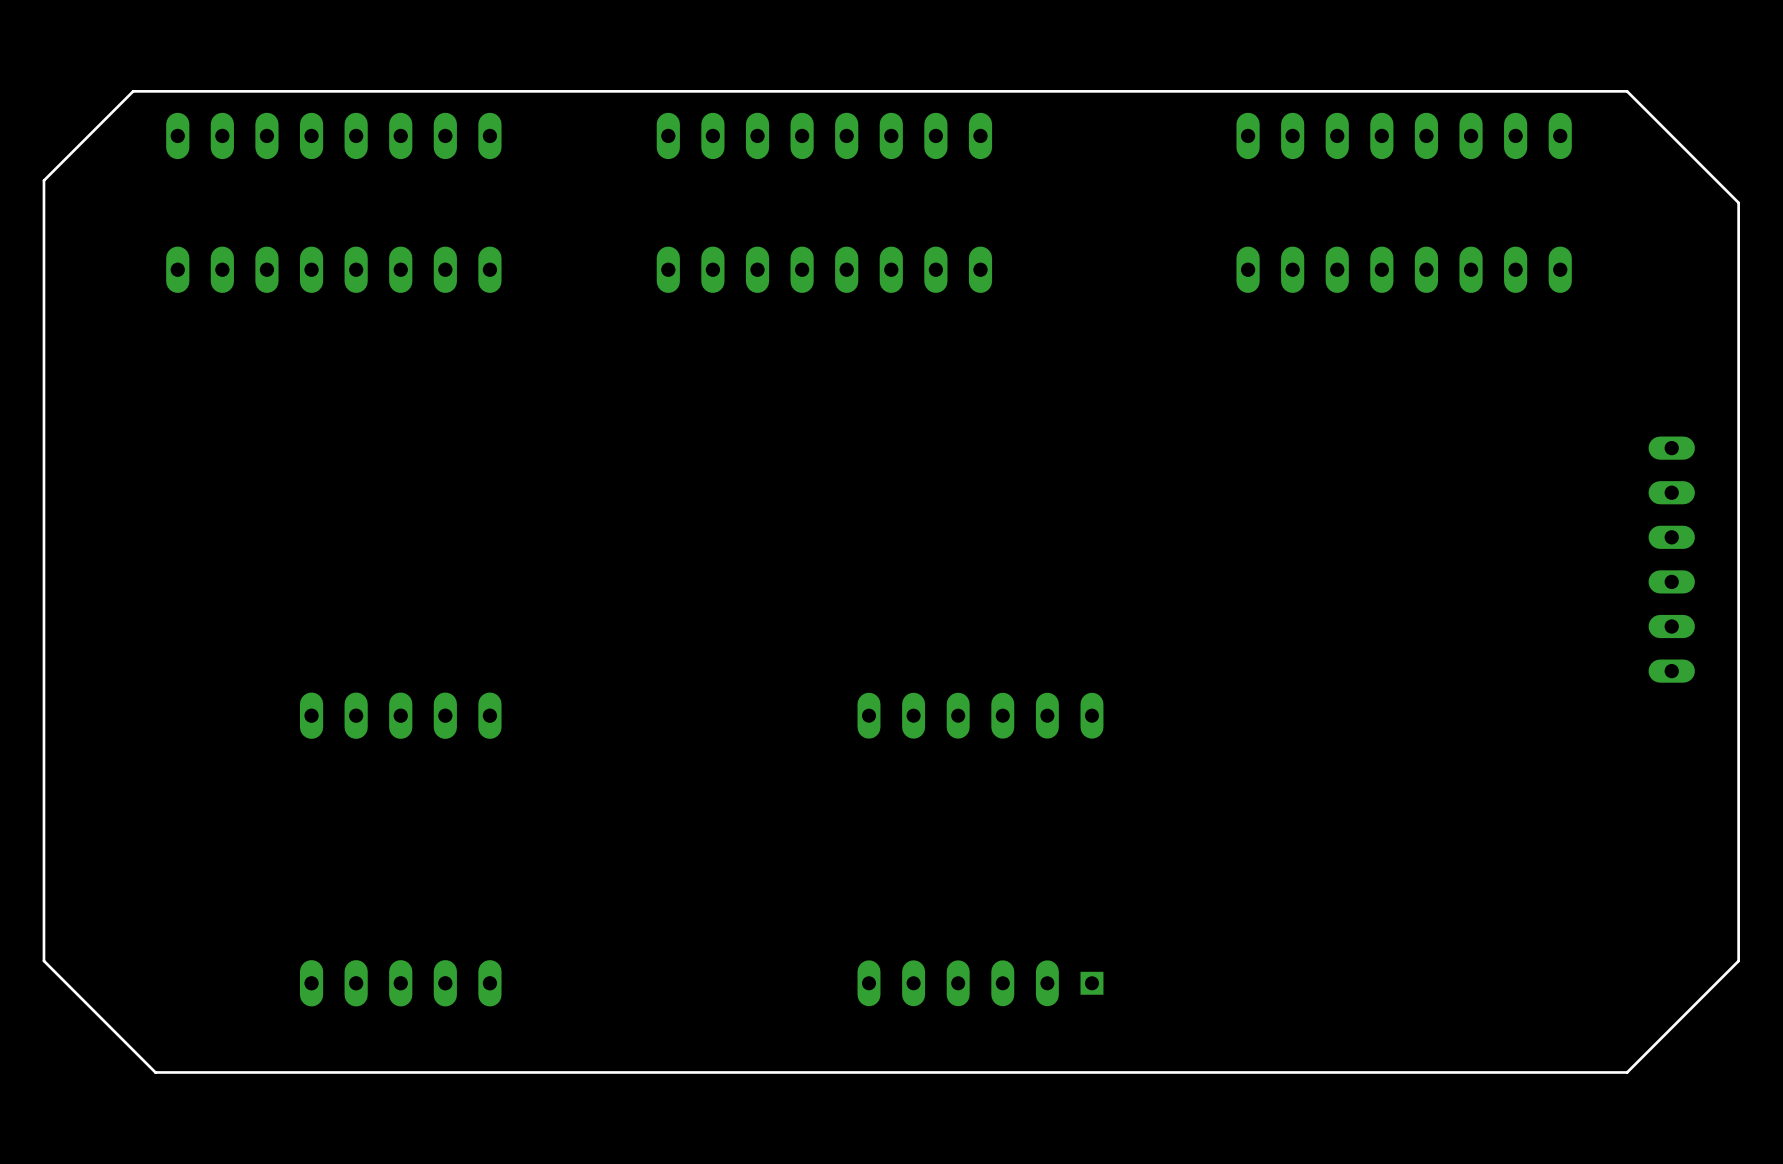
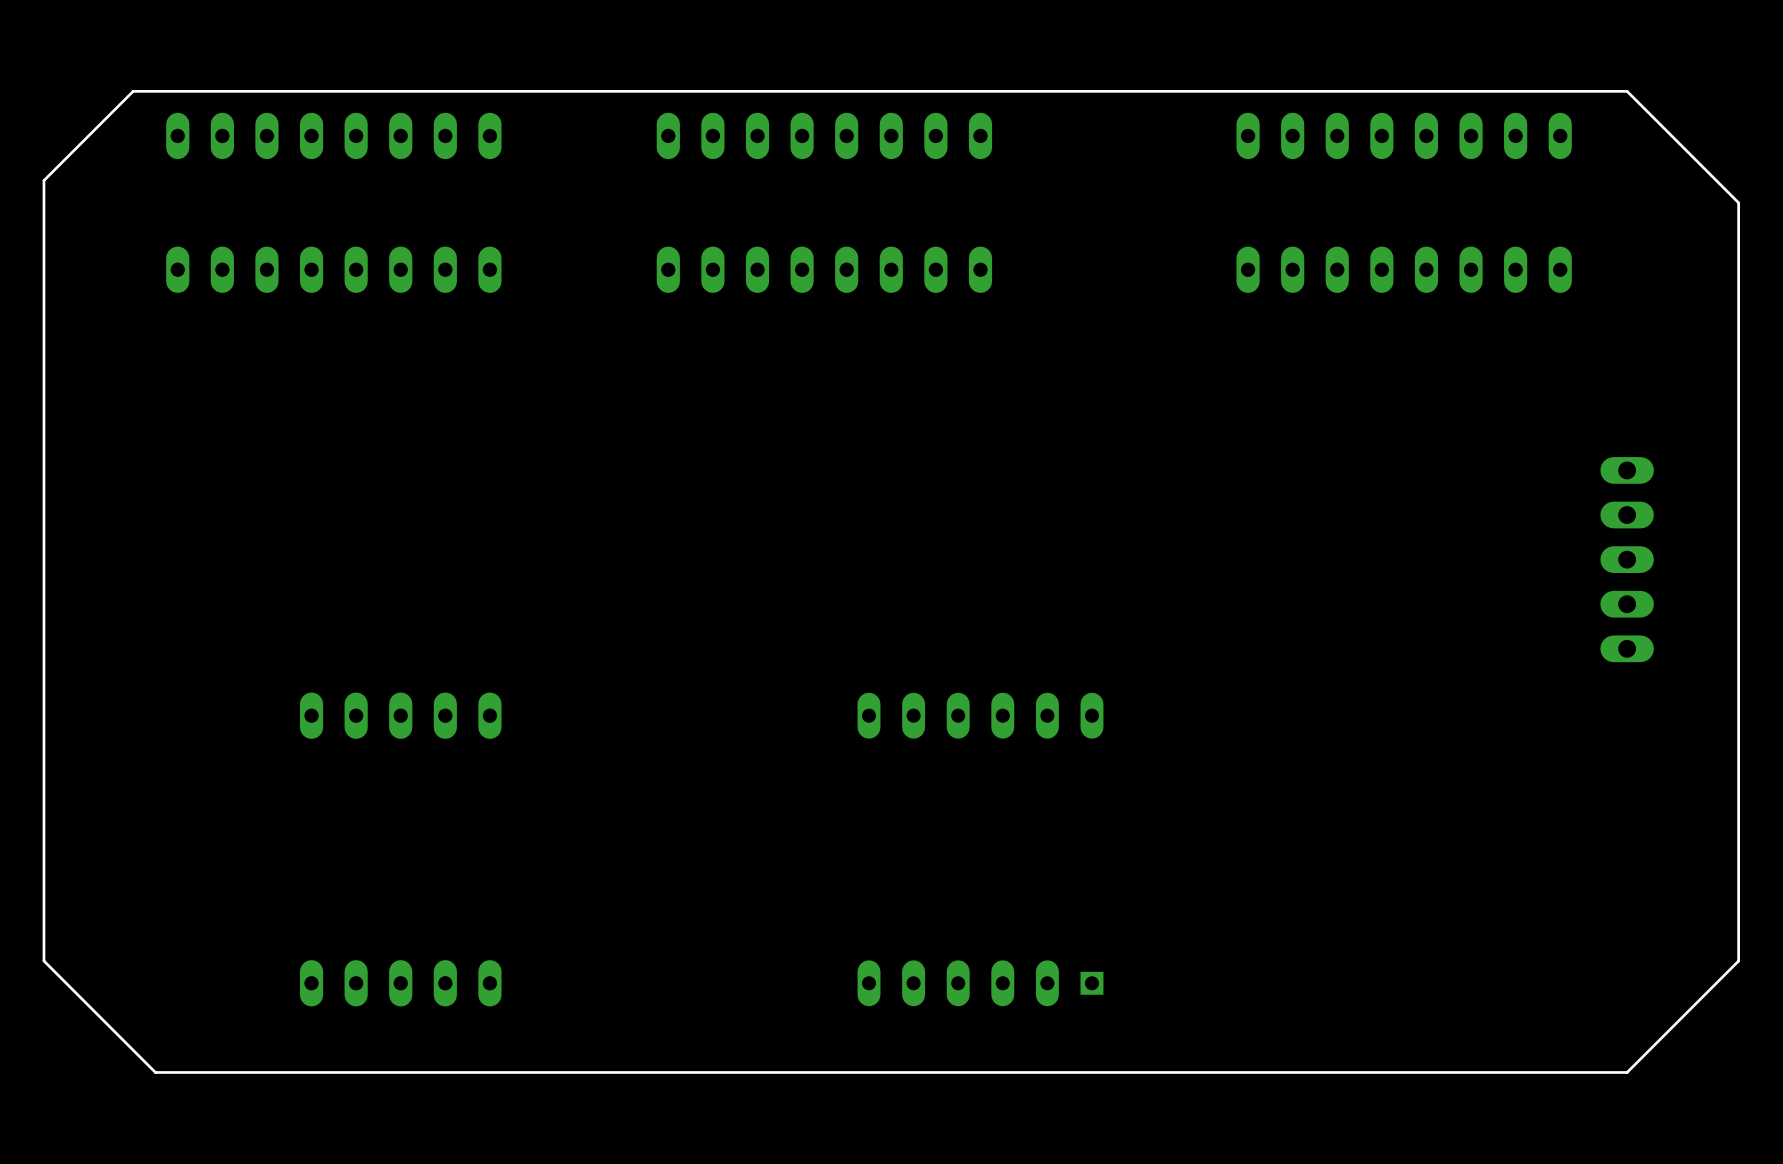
part: none -> (1627, 559)
part: (1671, 559) -> none

